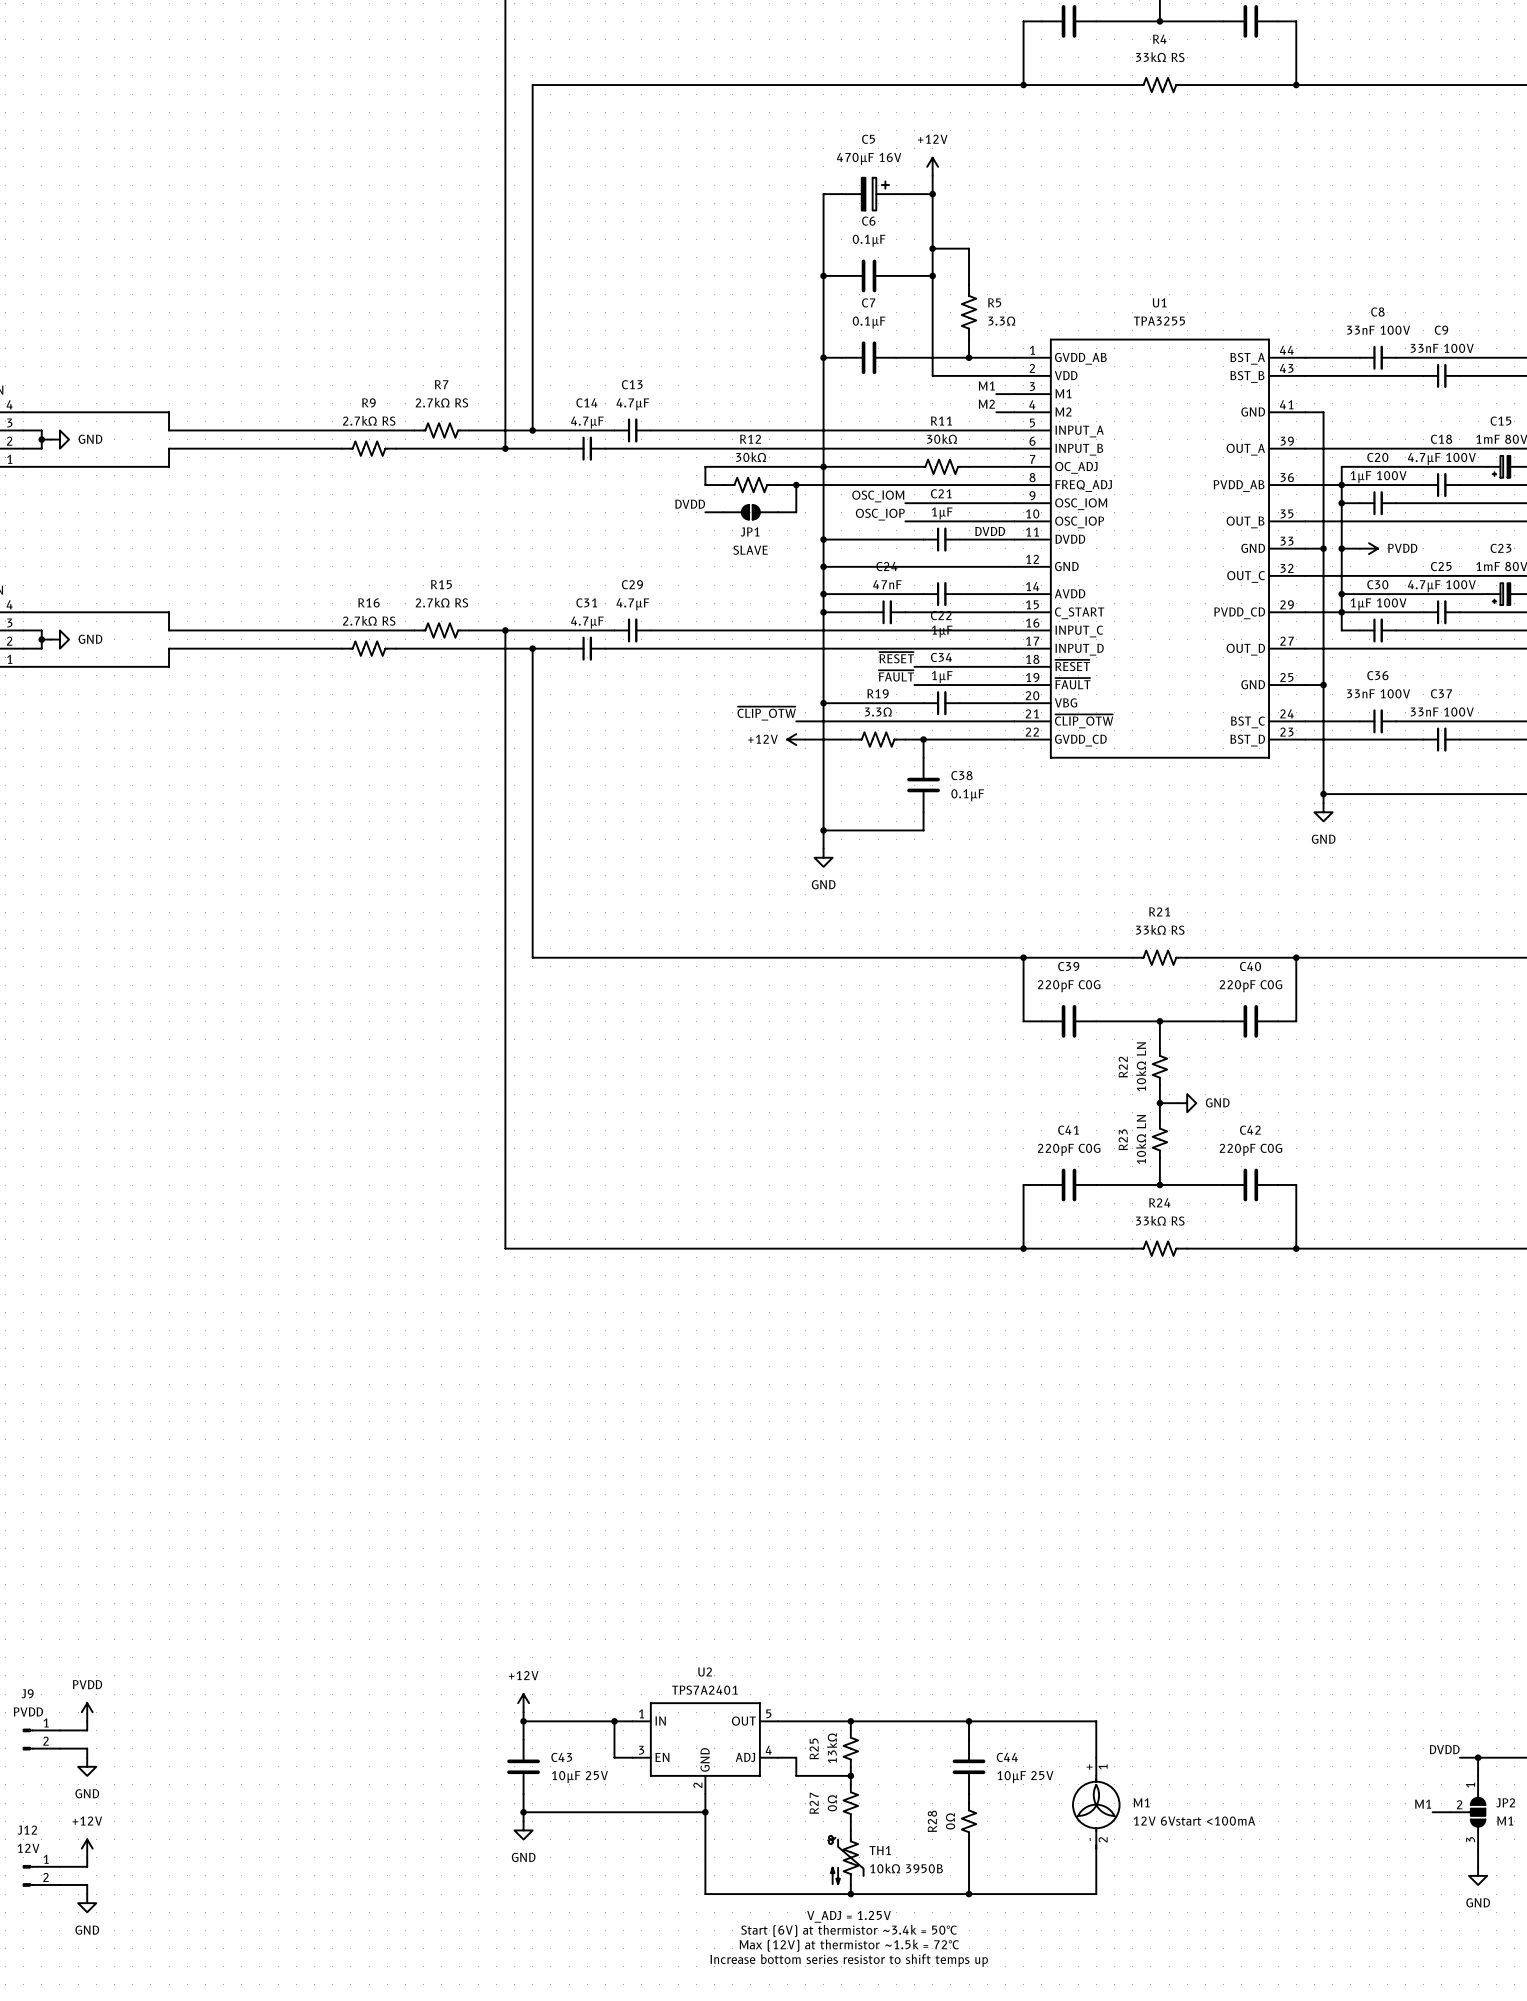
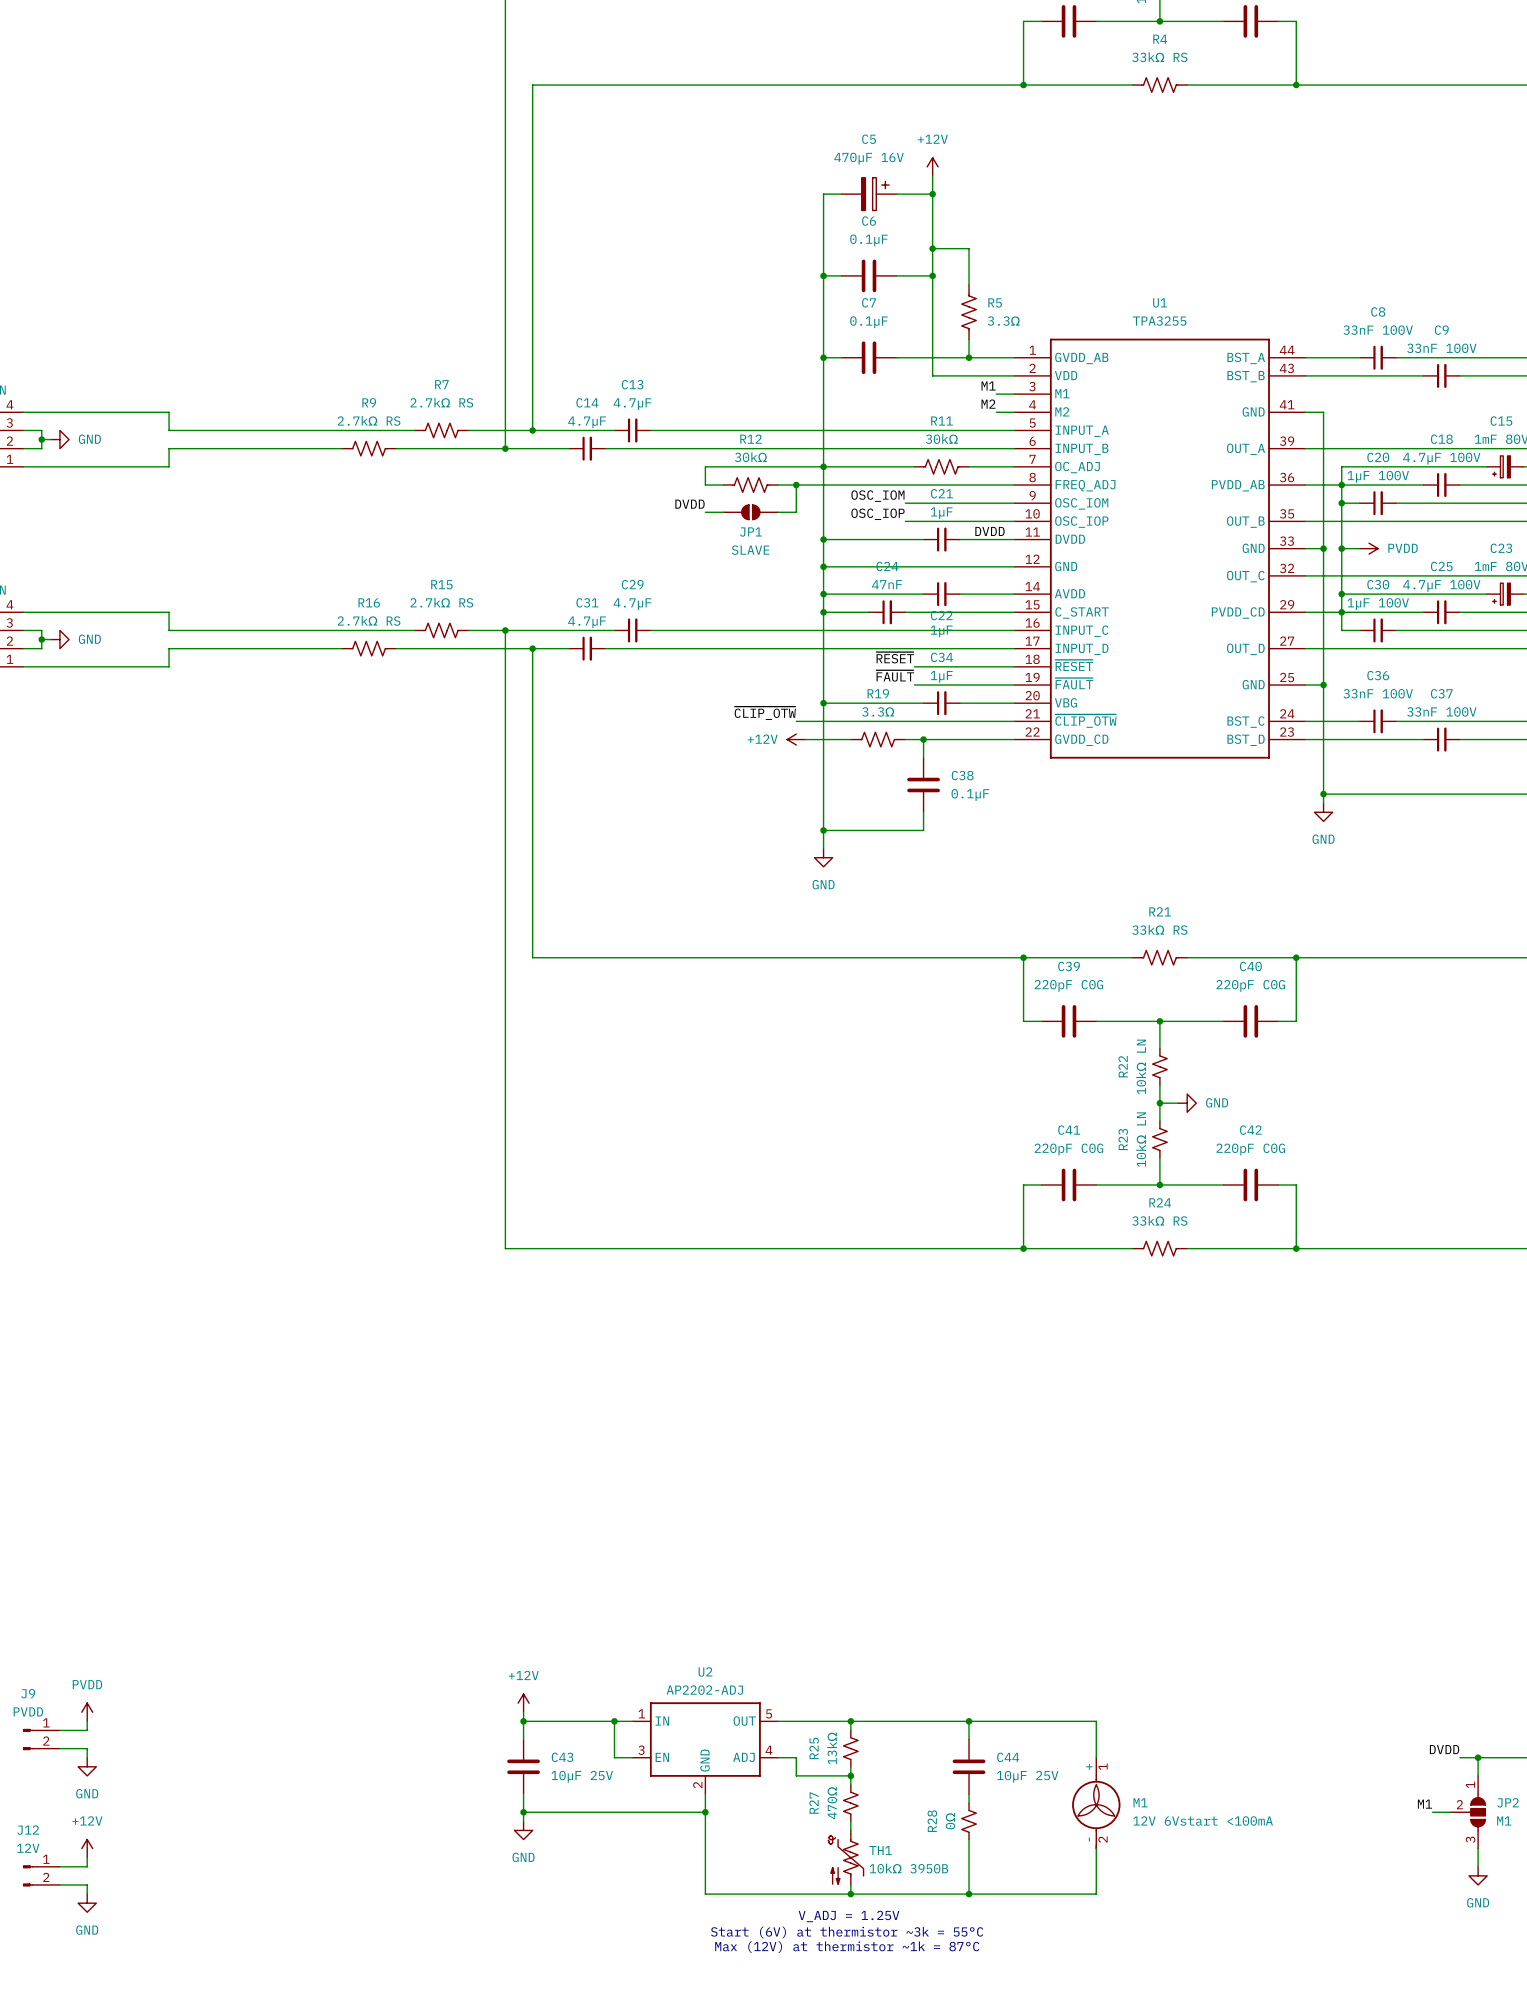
U2 value: TPS7A2401 (704, 1690) -> AP2202-ADJ (704, 1690)
R27 value: 0Ω (832, 1803) -> 470Ω (832, 1803)
text: Start (6V) at thermistor ~3.4k = 50°C (849, 1931) -> Start (6V) at thermistor ~3k = 55°C (847, 1932)
text: Max (12V) at thermistor ~1.5k = 72°C (849, 1945) -> Max (12V) at thermistor ~1k = 87°C (847, 1947)
text: Increase bottom series resistor to shift temps up (849, 1960) -> none

